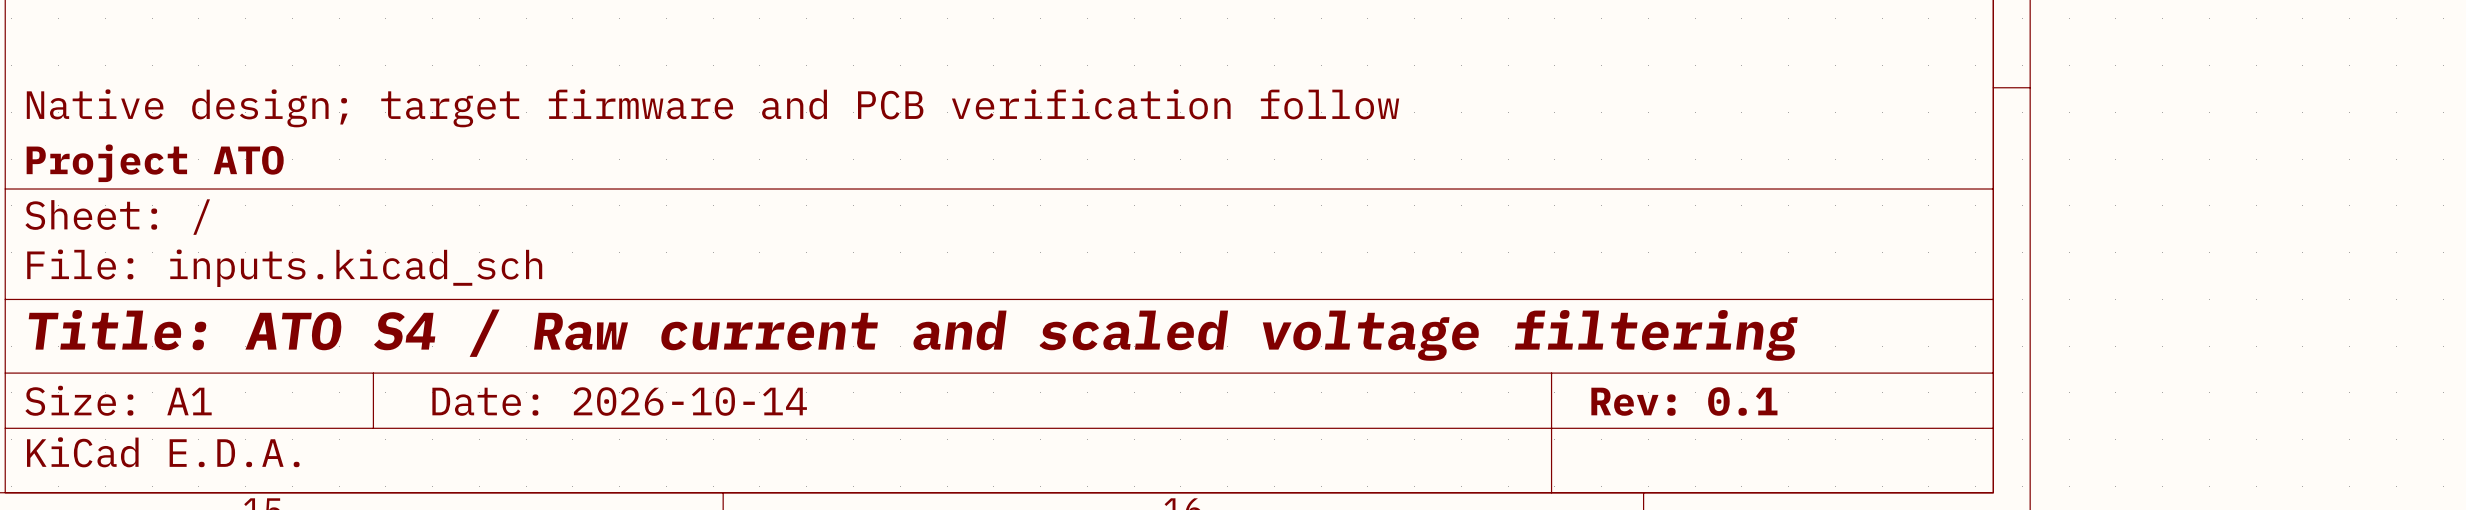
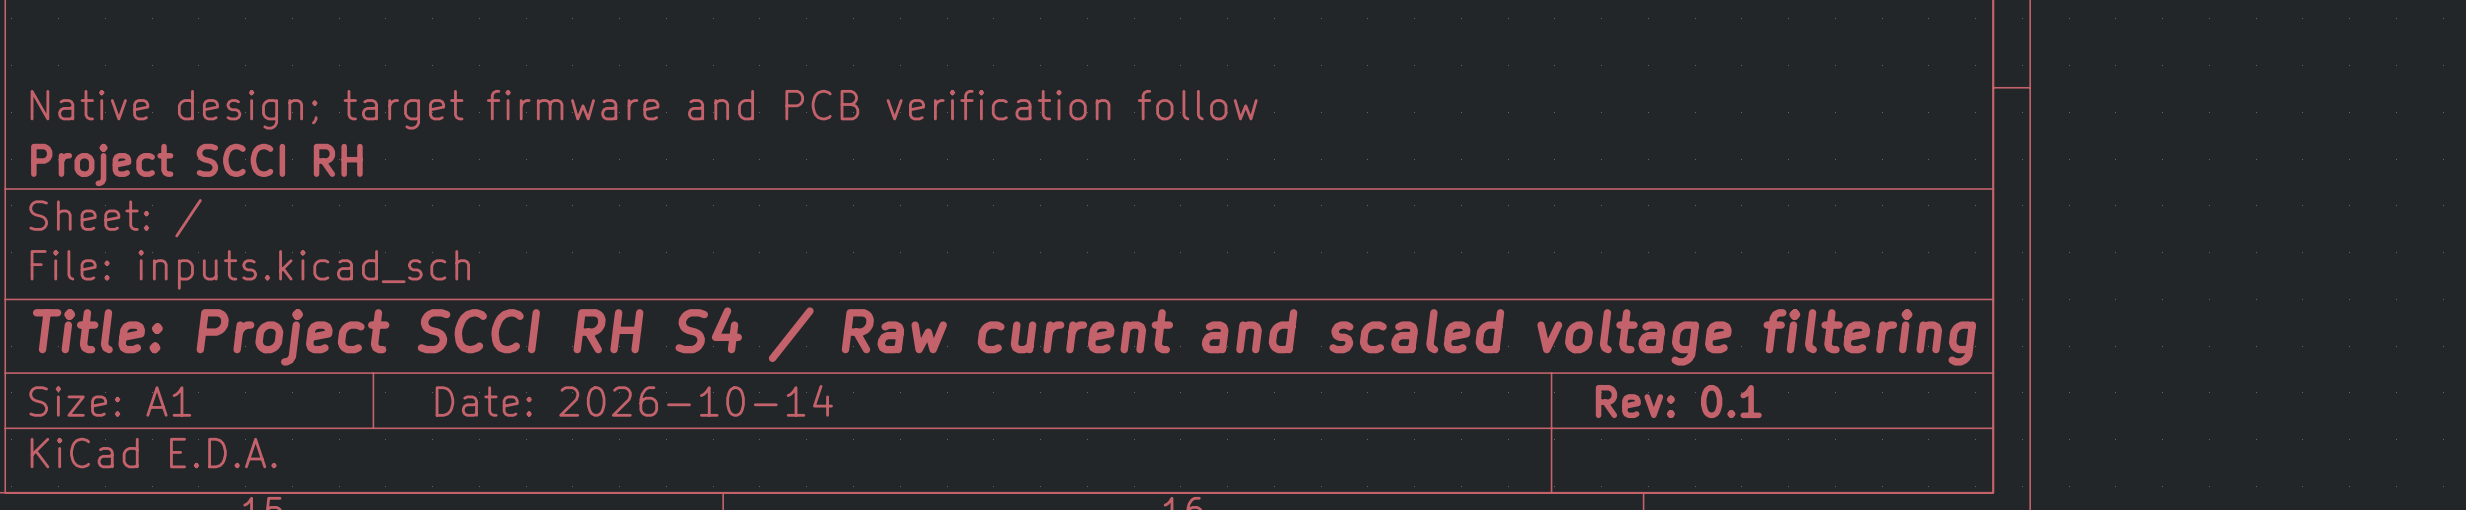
title block: Project ATO (155, 163) -> Project SCCI RH (196, 164)
title block: Title: ATO S4 / Raw current and scaled voltage filtering (913, 335) -> Title: Project SCCI RH S4 / Raw current and scaled voltage filtering (1004, 336)

